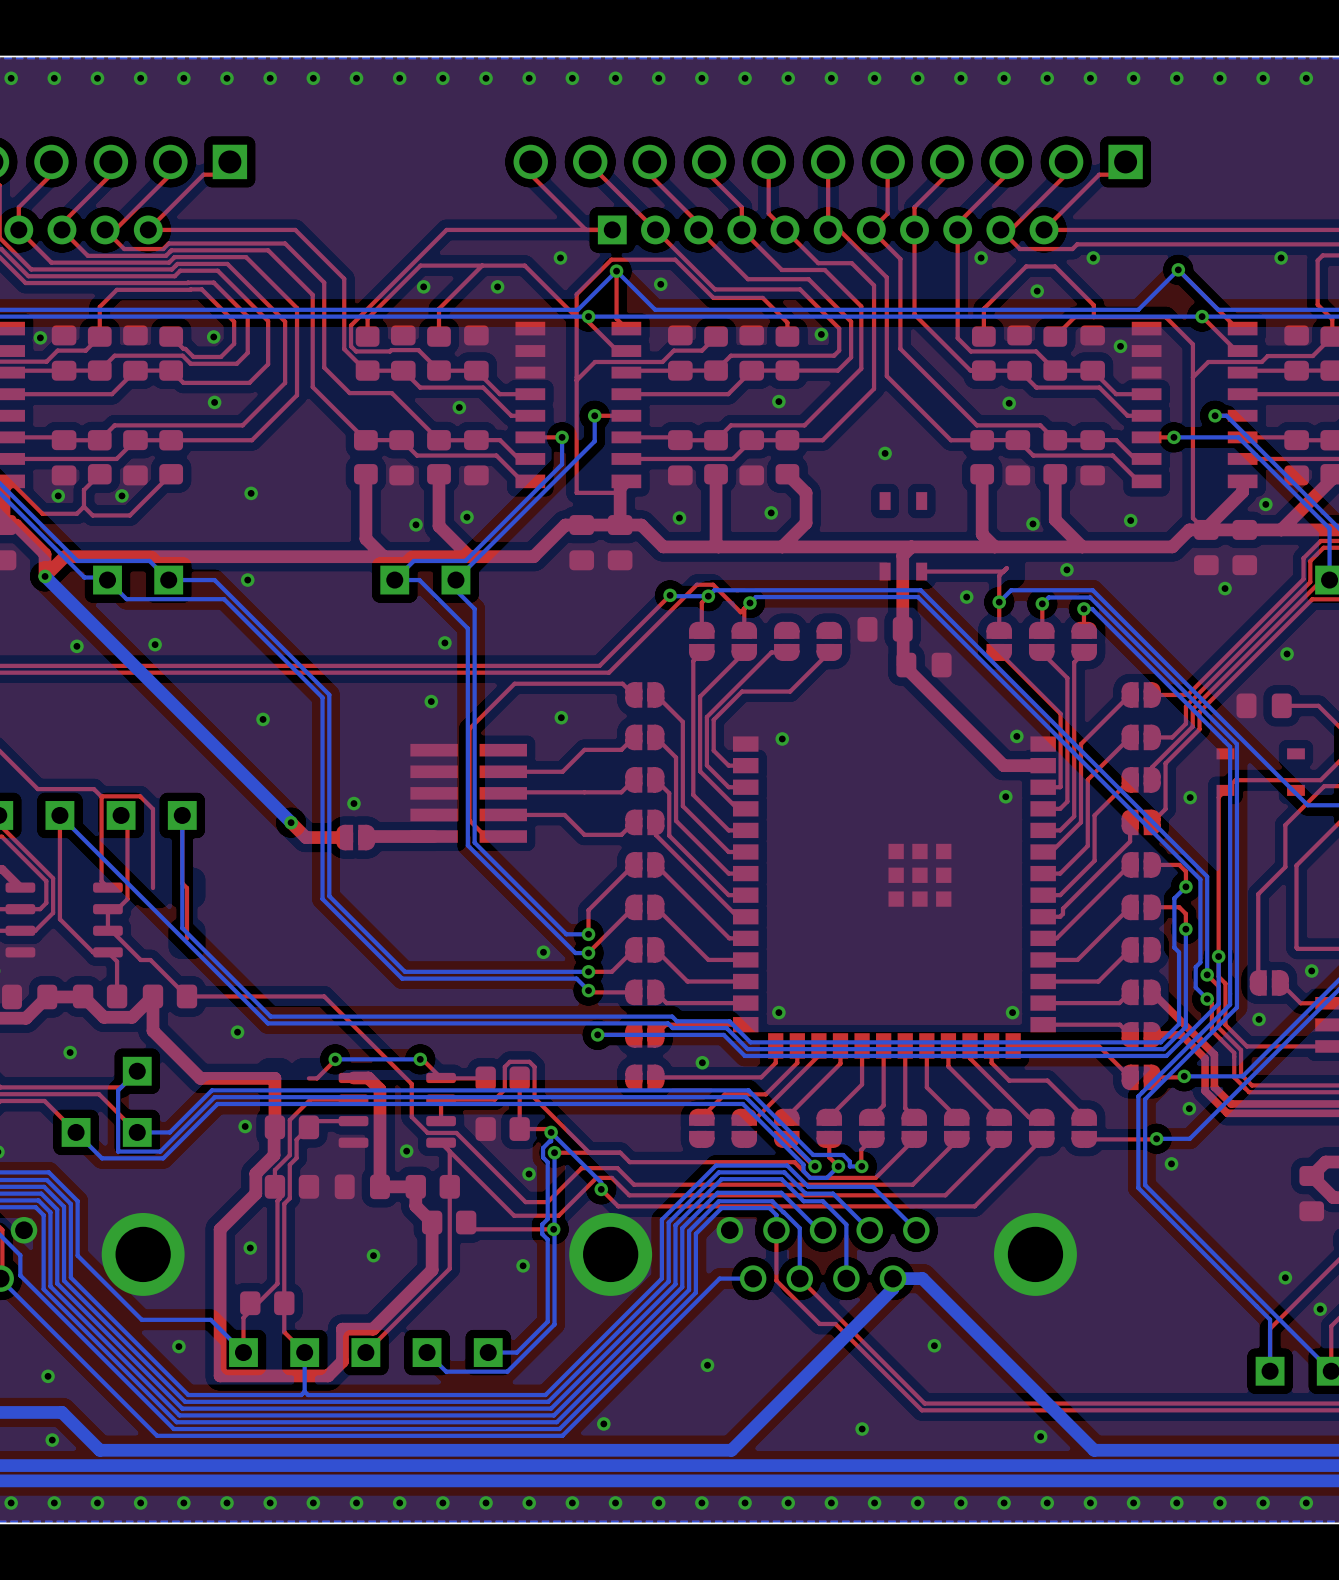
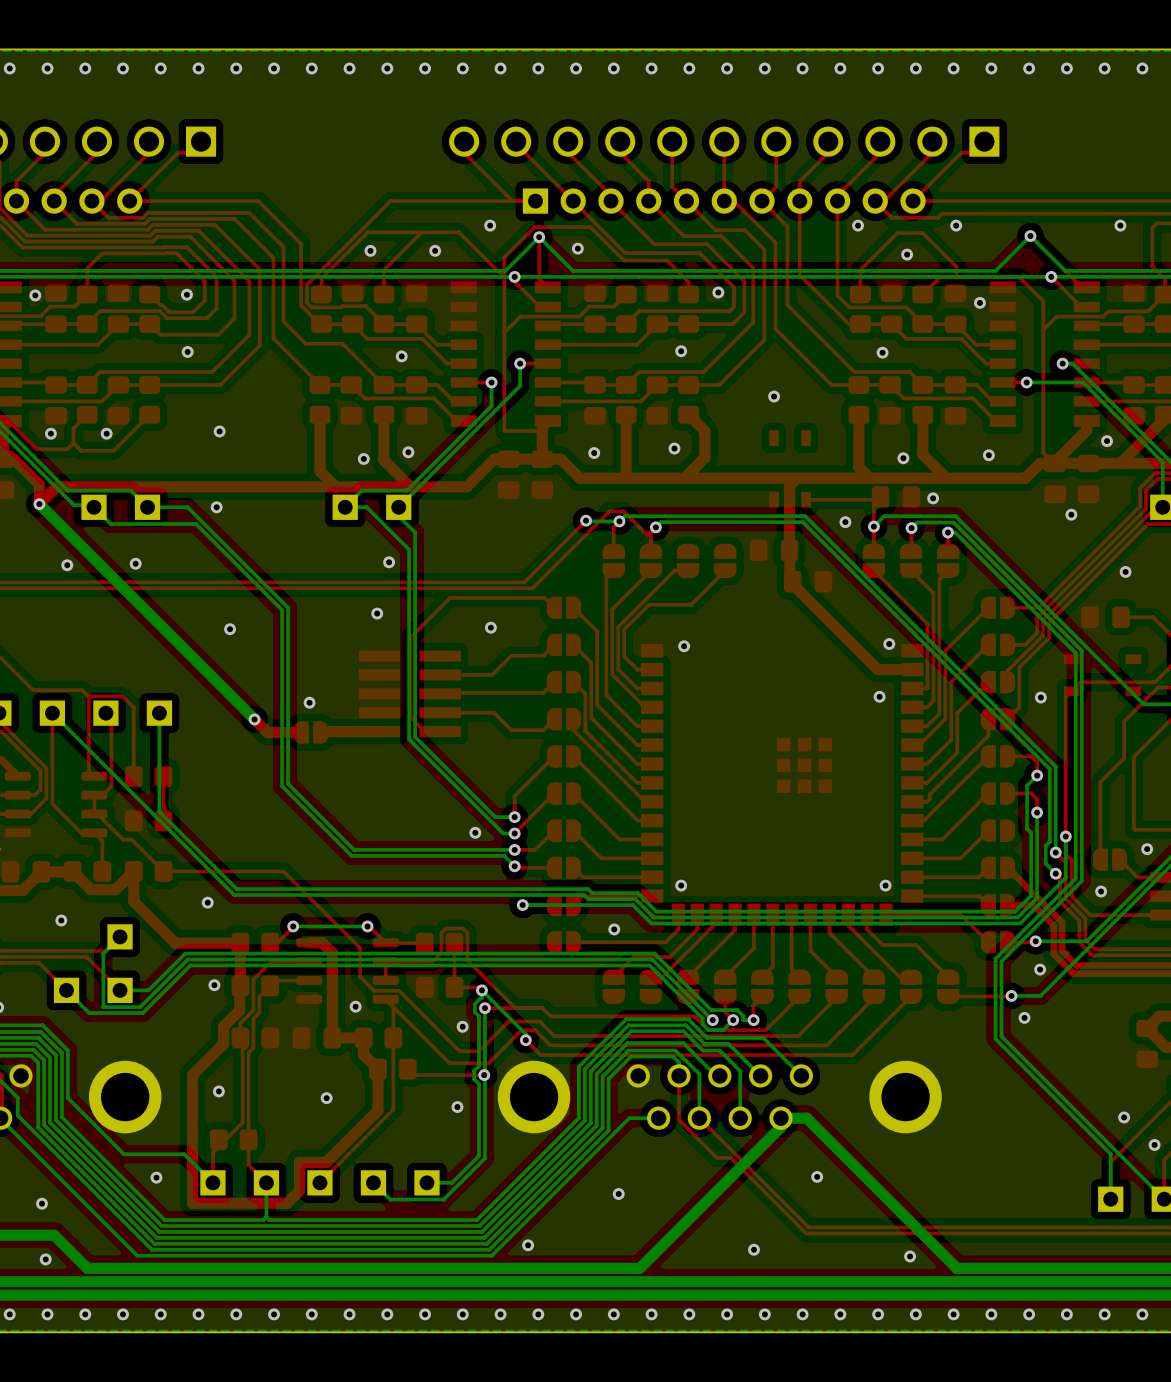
part: none -> (895, 496)
part: none -> (148, 776)
part: none -> (148, 820)
part: none -> (255, 943)

